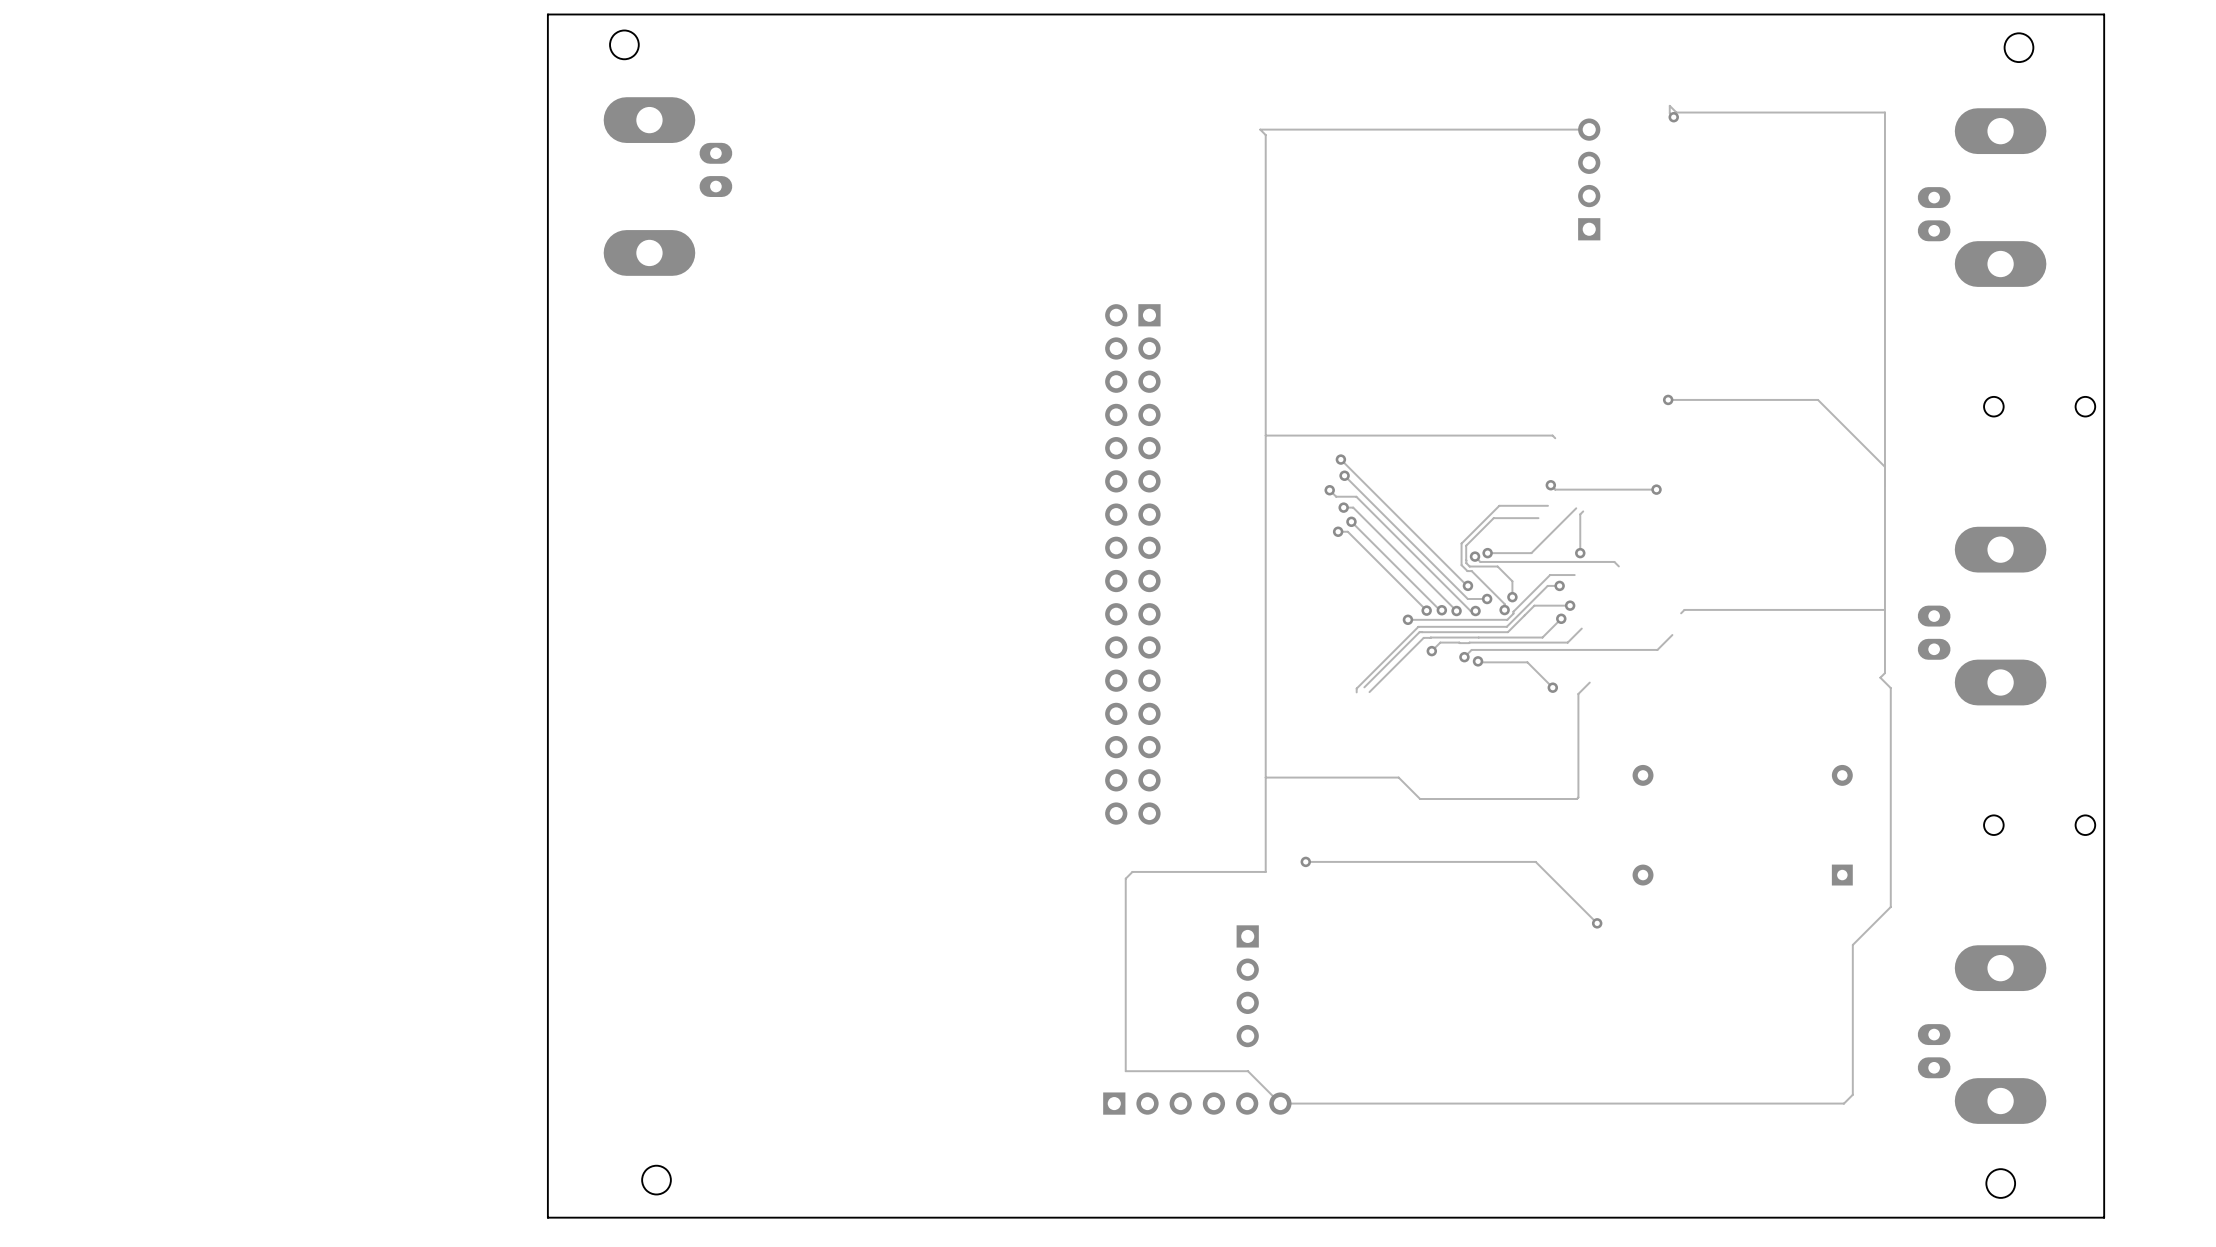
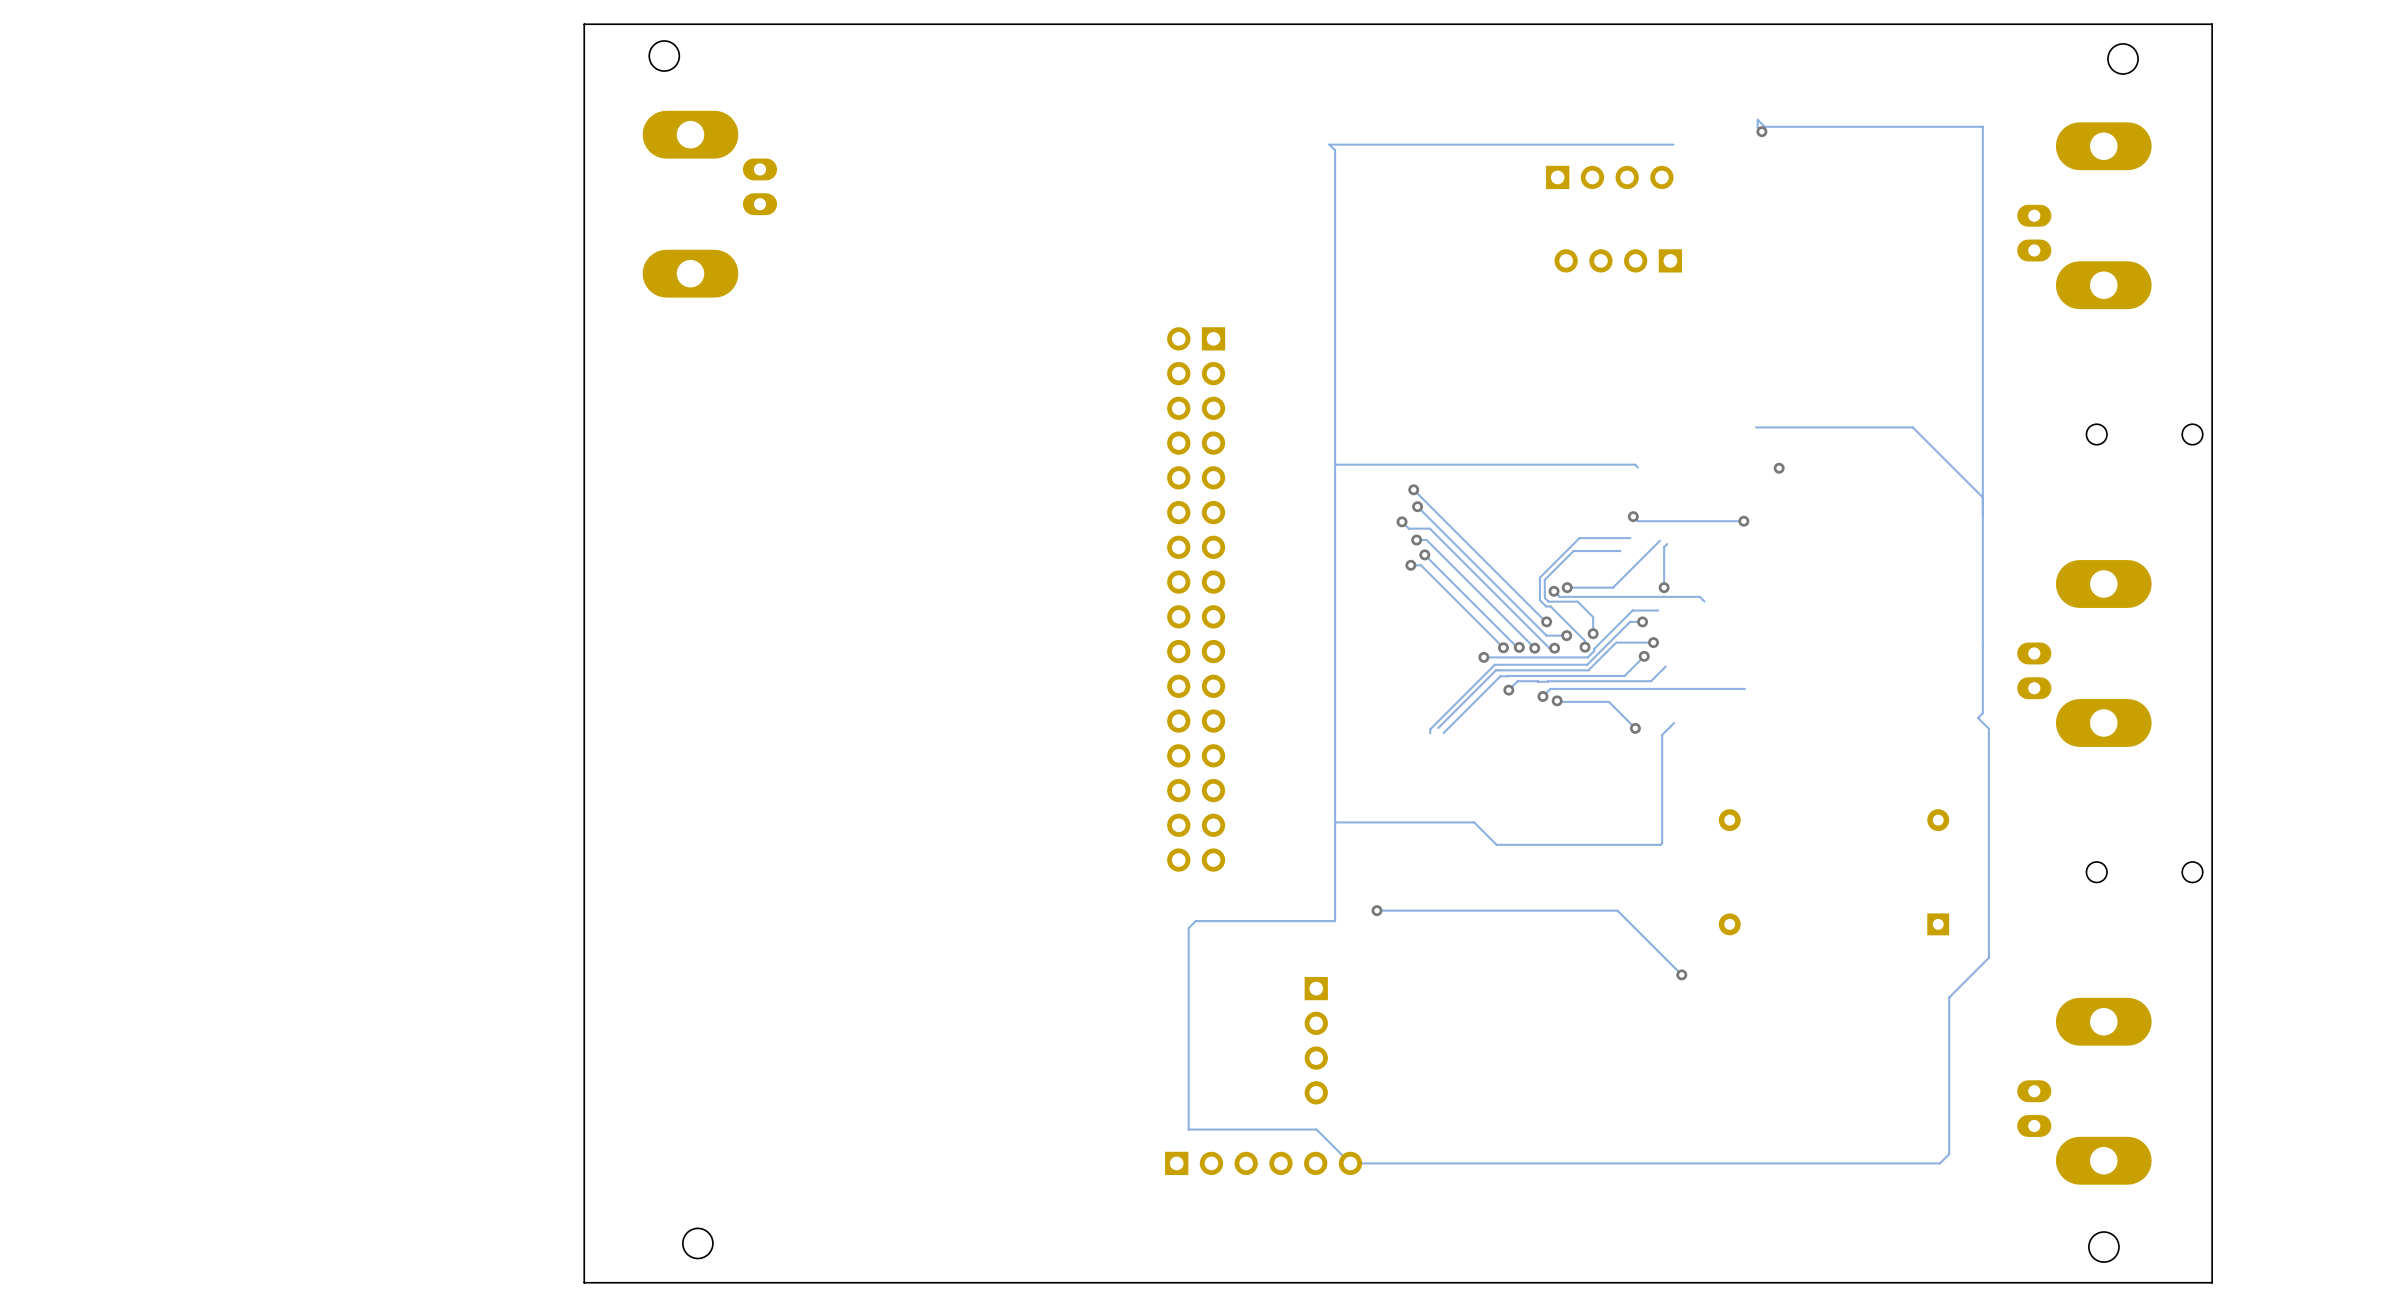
part: none -> (1609, 177)
part: (1589, 179) -> none
part: none -> (1618, 260)
via position: (1668, 399) -> (1779, 468)
track: (1884, 609) (1684, 609) (1681, 613) -> none
track: (1672, 635) (1657, 649) -> none

